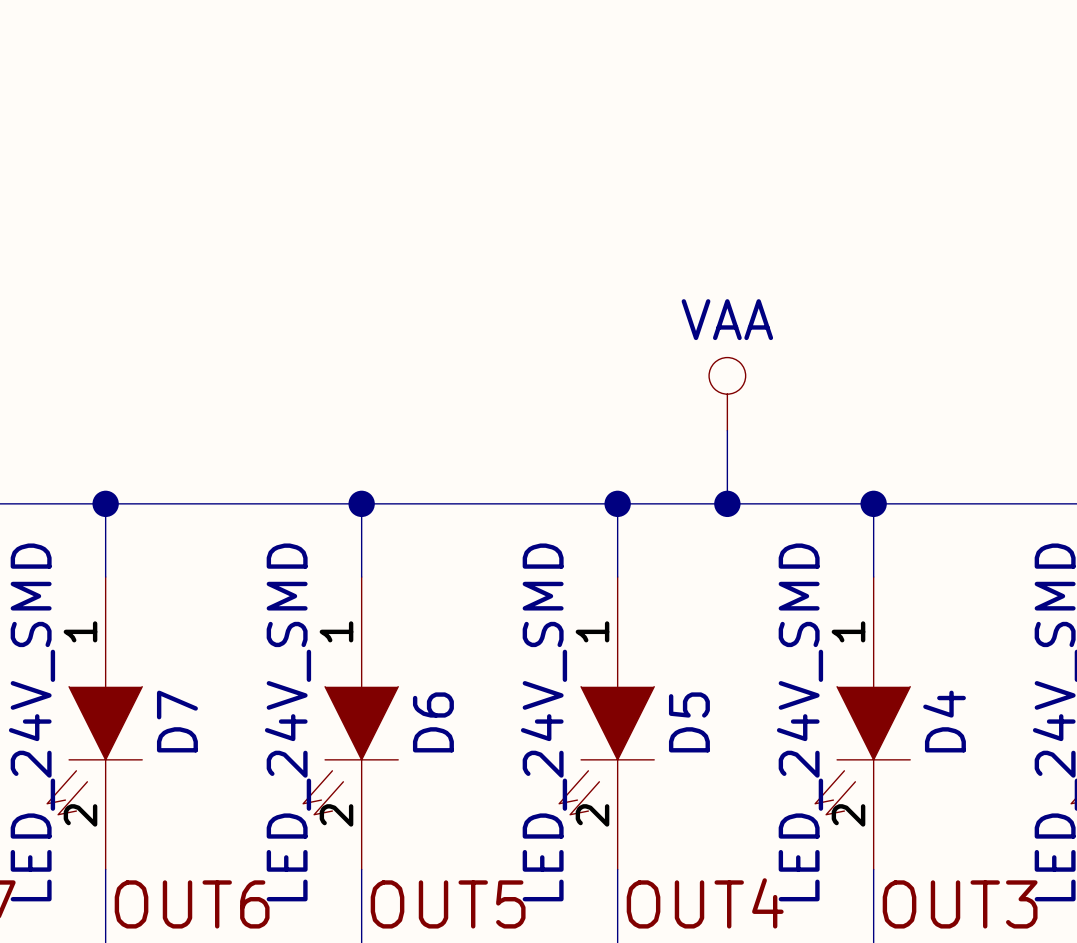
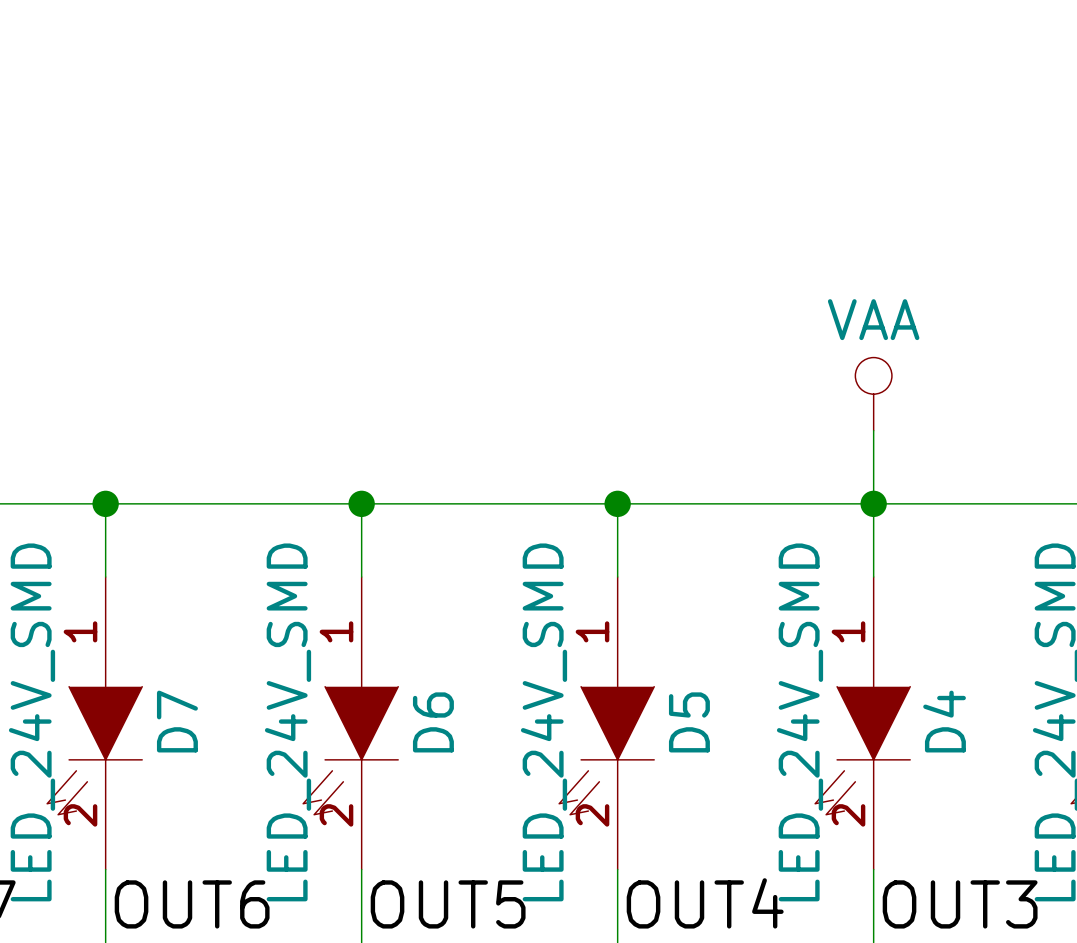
power symbol position: VAA (727, 394) -> VAA (873, 394)
wire: (727, 430) (727, 503) -> (873, 430) (873, 503)
junction: (727, 503) -> none

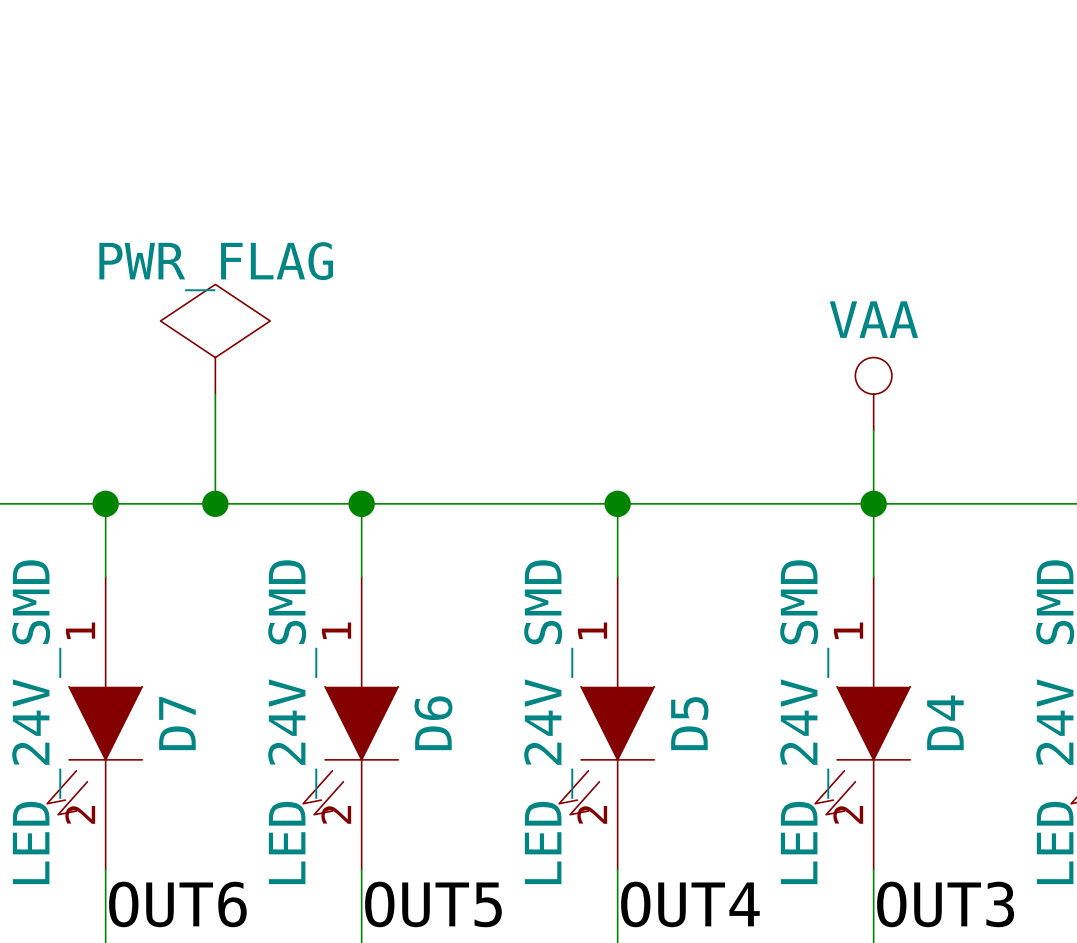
power symbol: none -> PWR_FLAG (215, 339)
wire: none -> (215, 394) (215, 503)
junction: none -> (215, 503)

